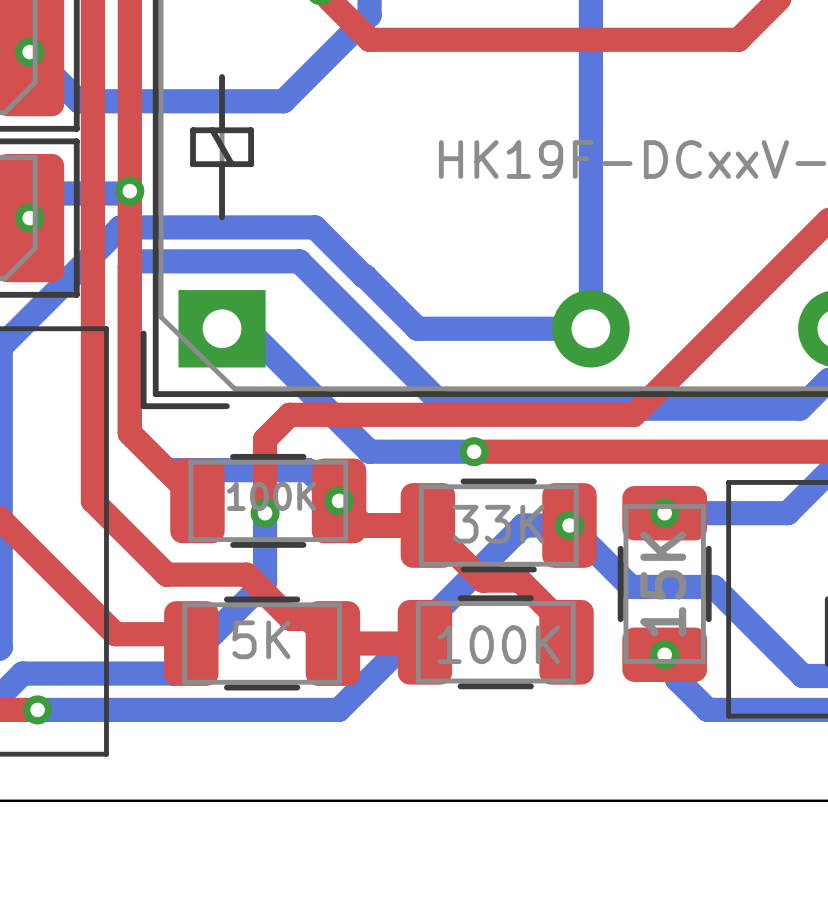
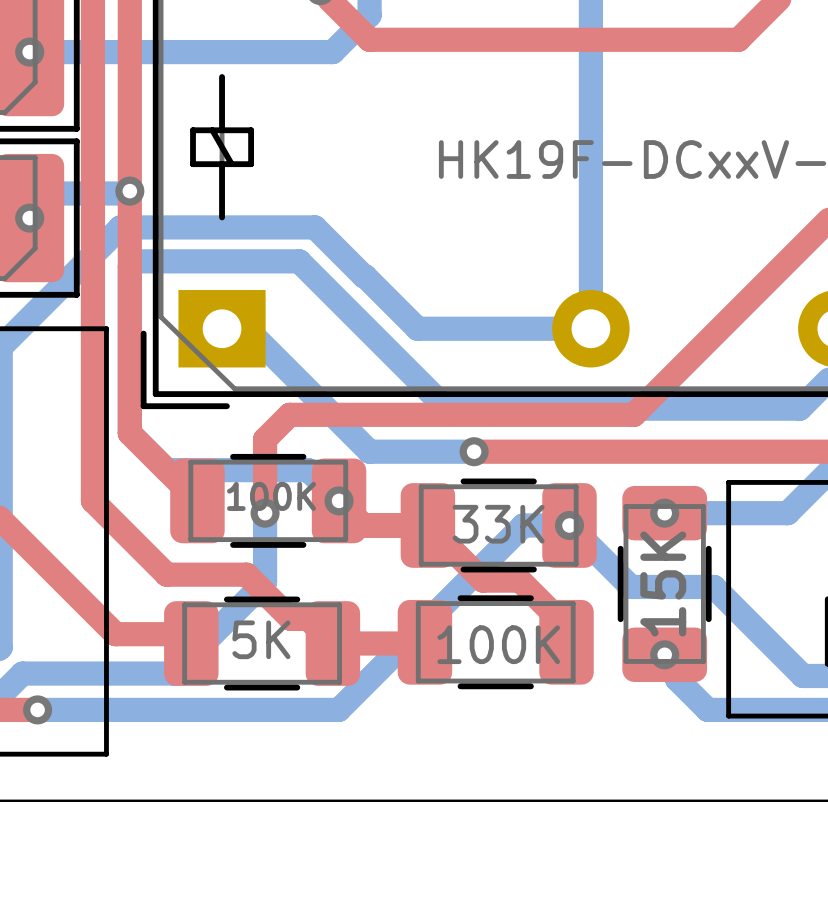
bottom track: (29, 52) (78, 101) (283, 101) (332, 52) -> (29, 52) (332, 52)

